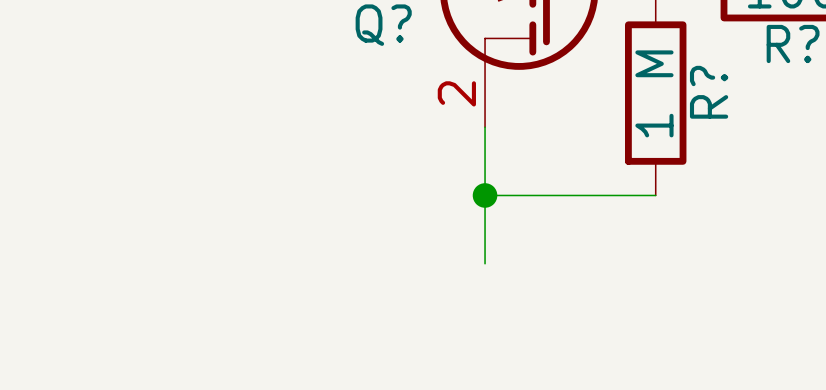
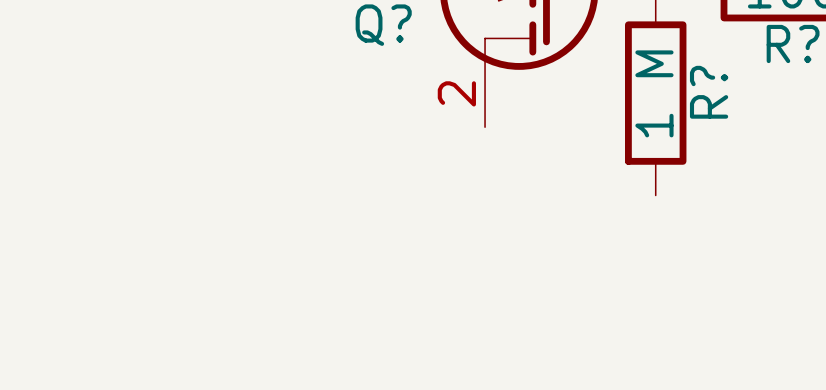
wire: (485, 127) (485, 263) -> none
wire: (485, 195) (655, 195) -> none
junction: (485, 195) -> none

